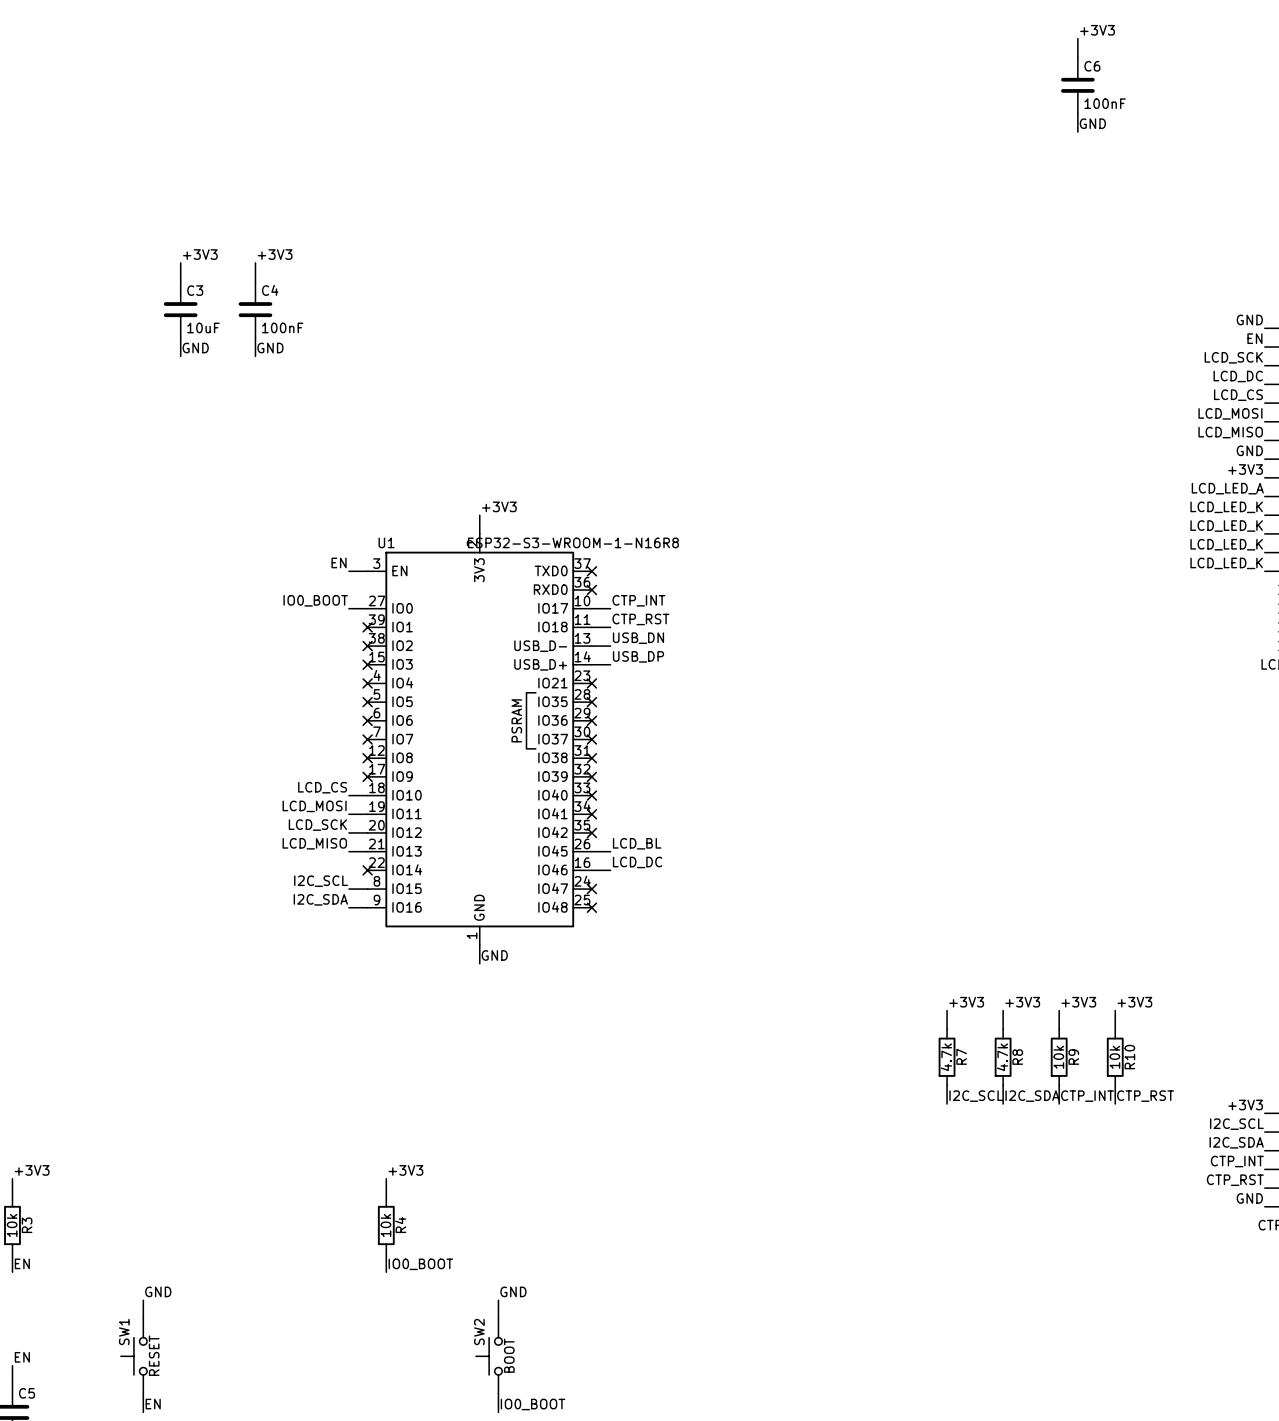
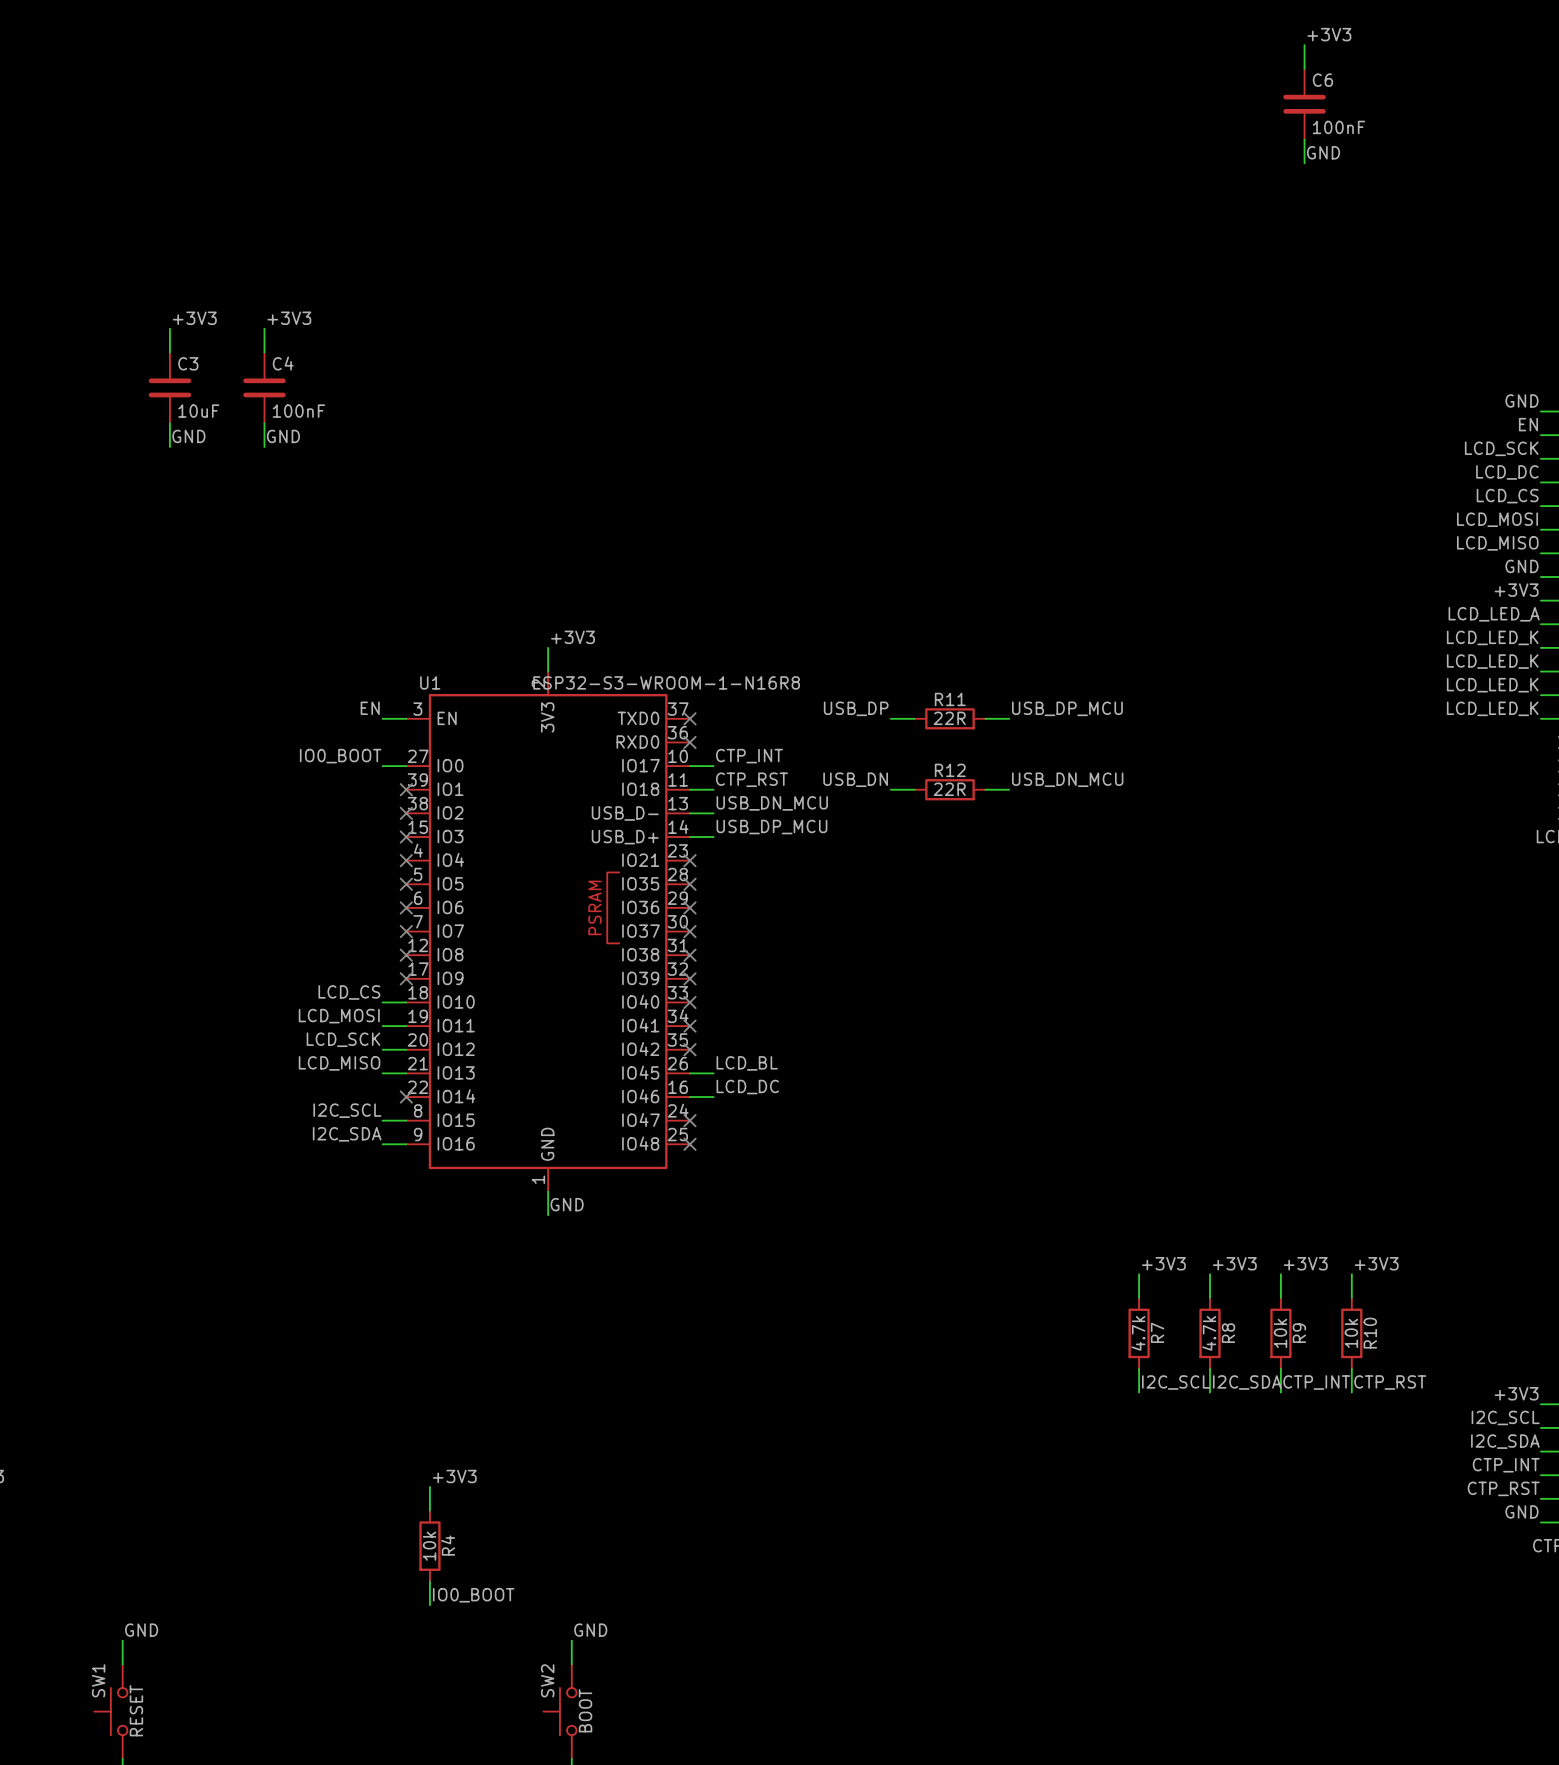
label: none -> USB_DP (856, 708)
label: none -> USB_DP_MCU (1067, 708)
wire: none -> (890, 718) (914, 718)
R11: none -> 22R (949, 718)
wire: none -> (985, 718) (1009, 718)
label: none -> USB_DN (855, 779)
label: none -> USB_DN_MCU (1067, 779)
wire: none -> (890, 789) (914, 789)
R12: none -> 22R (949, 789)
wire: none -> (985, 789) (1009, 789)
label: USB_DN (638, 638) -> USB_DN_MCU (772, 803)
label: USB_DP (638, 656) -> USB_DP_MCU (771, 827)

